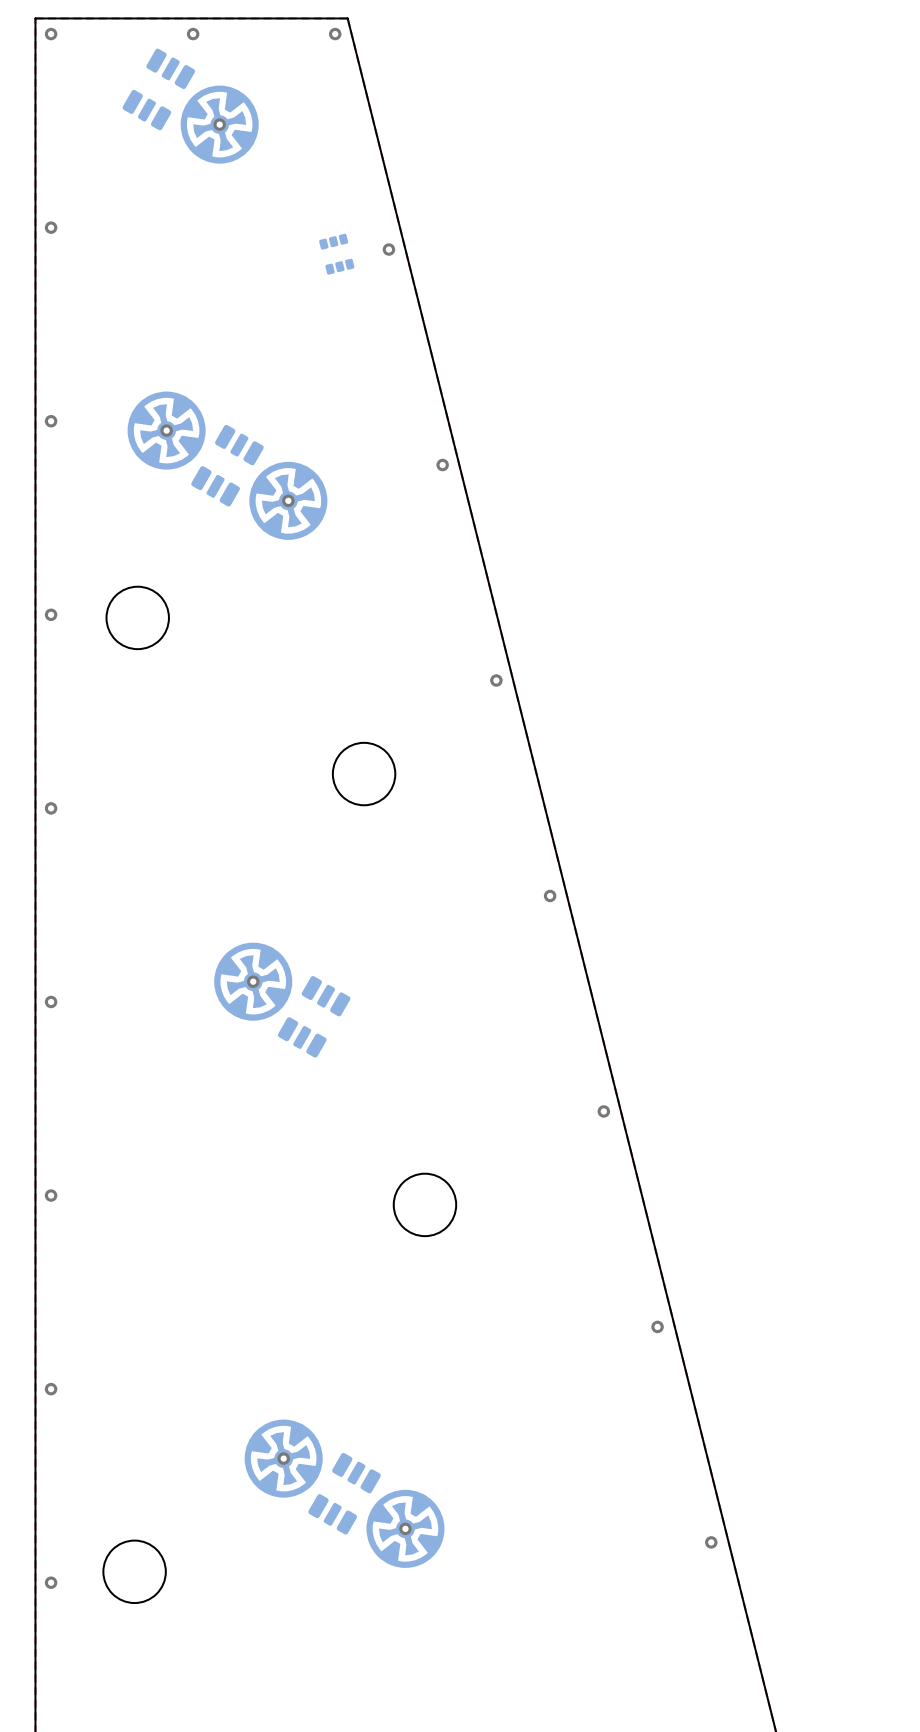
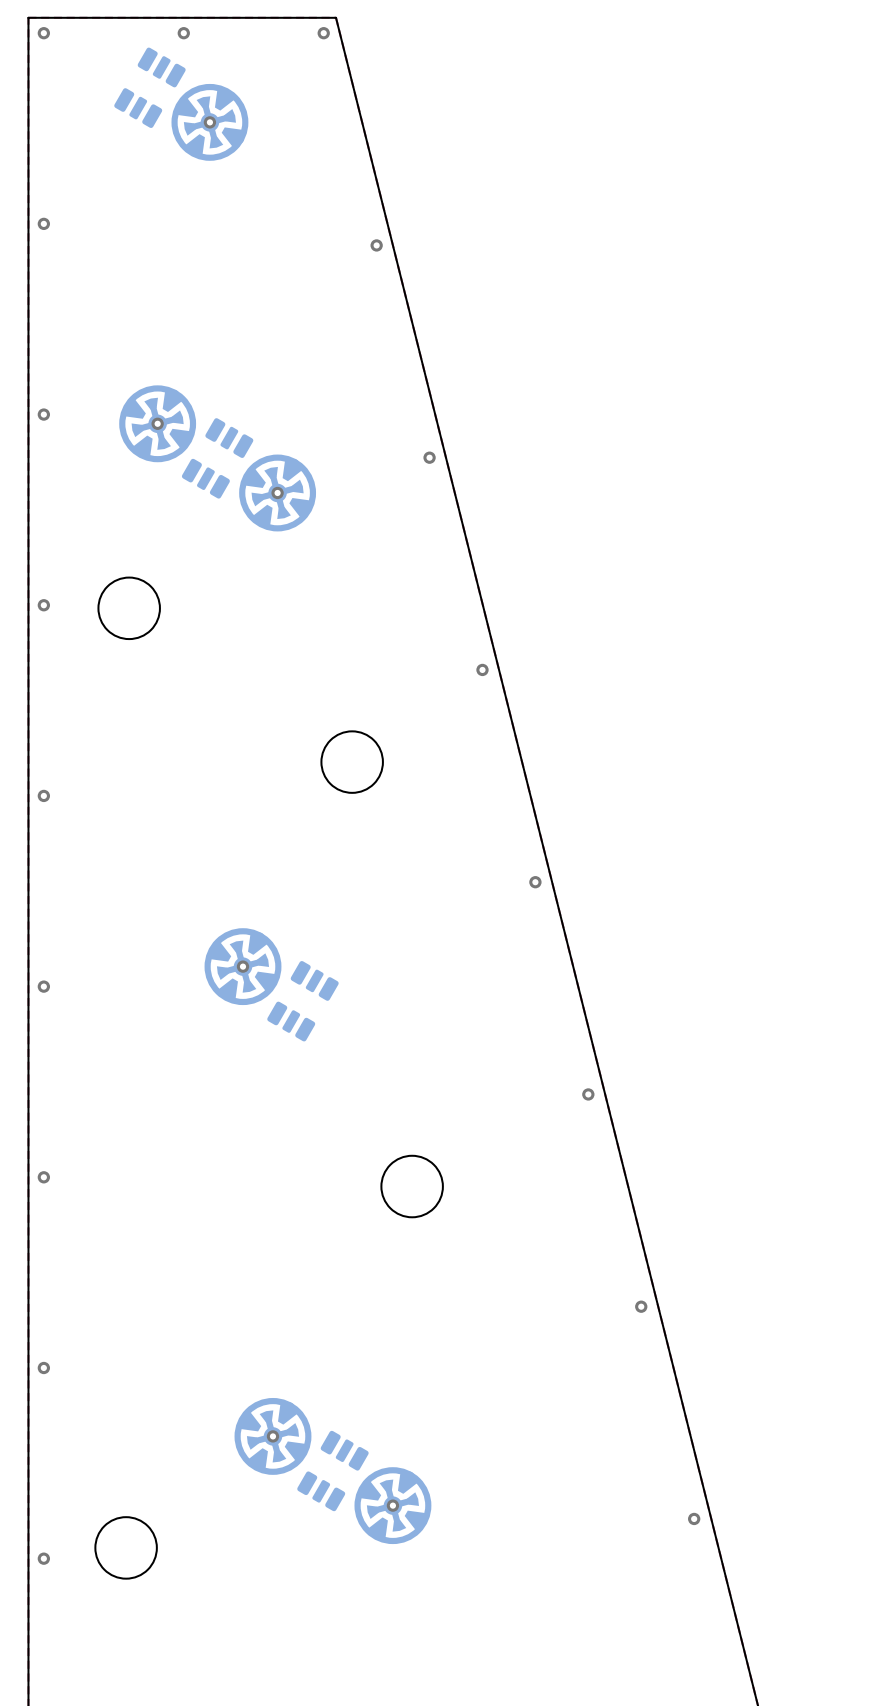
part: (336, 254) -> none

